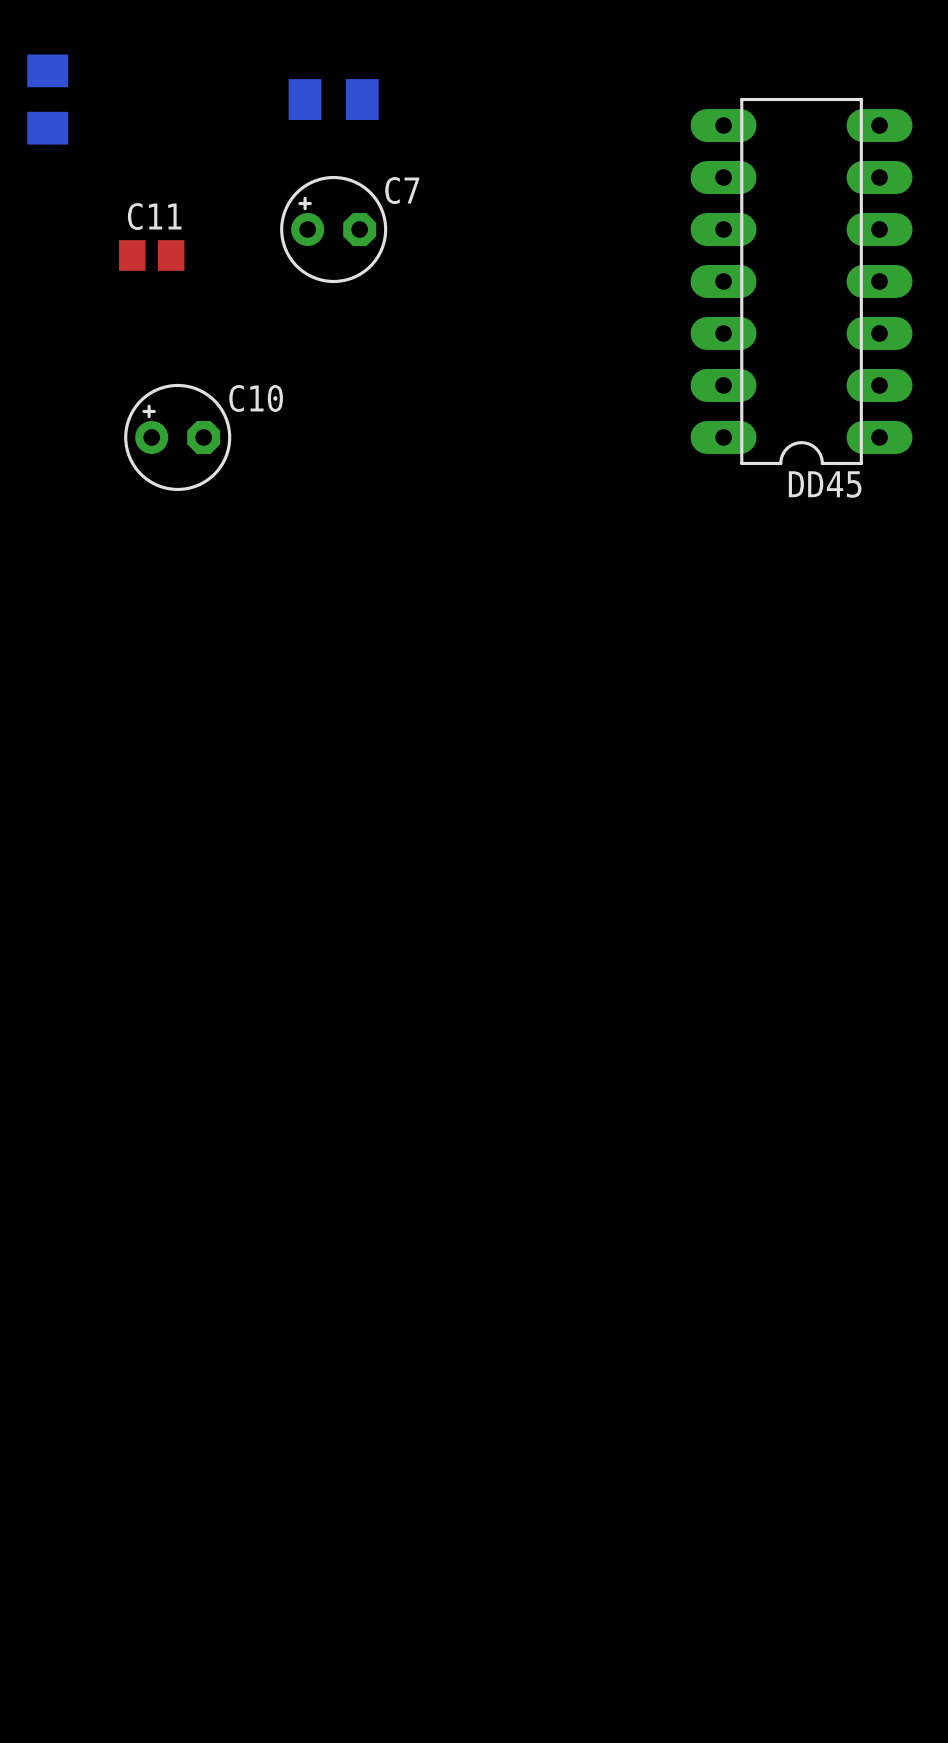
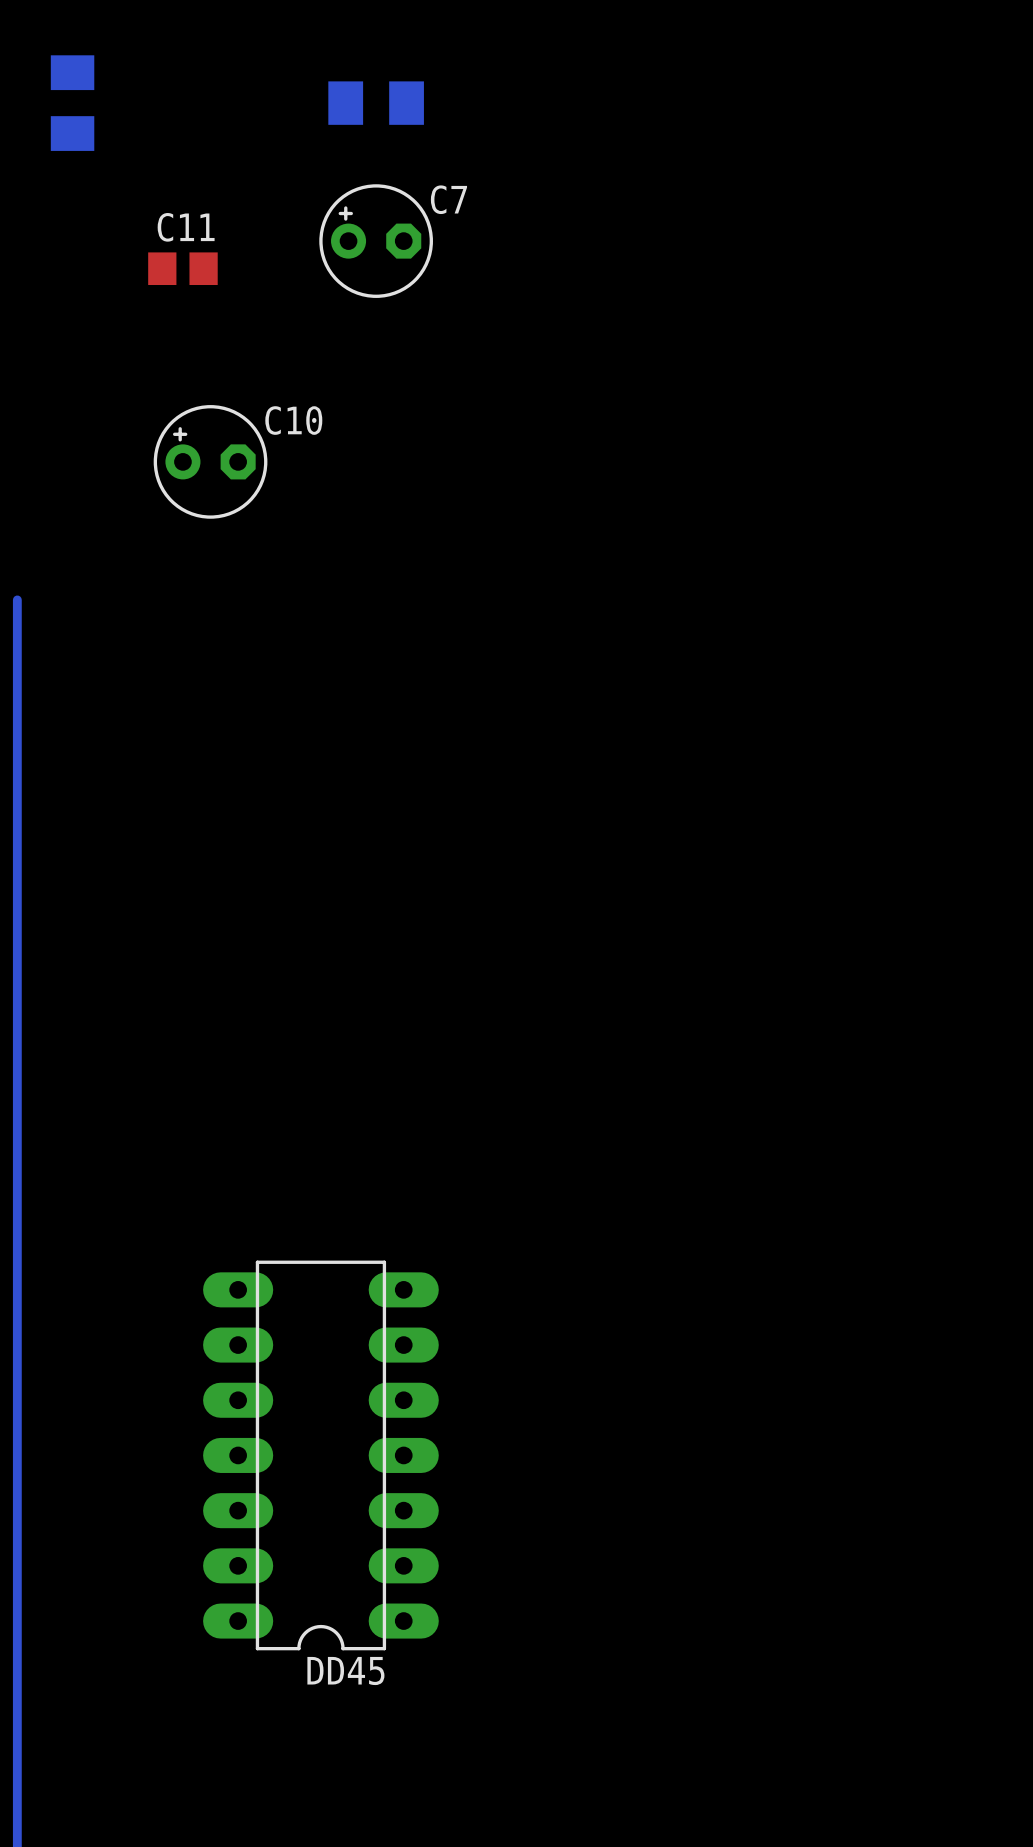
DD45 position: (801, 281) -> (320, 1455)

